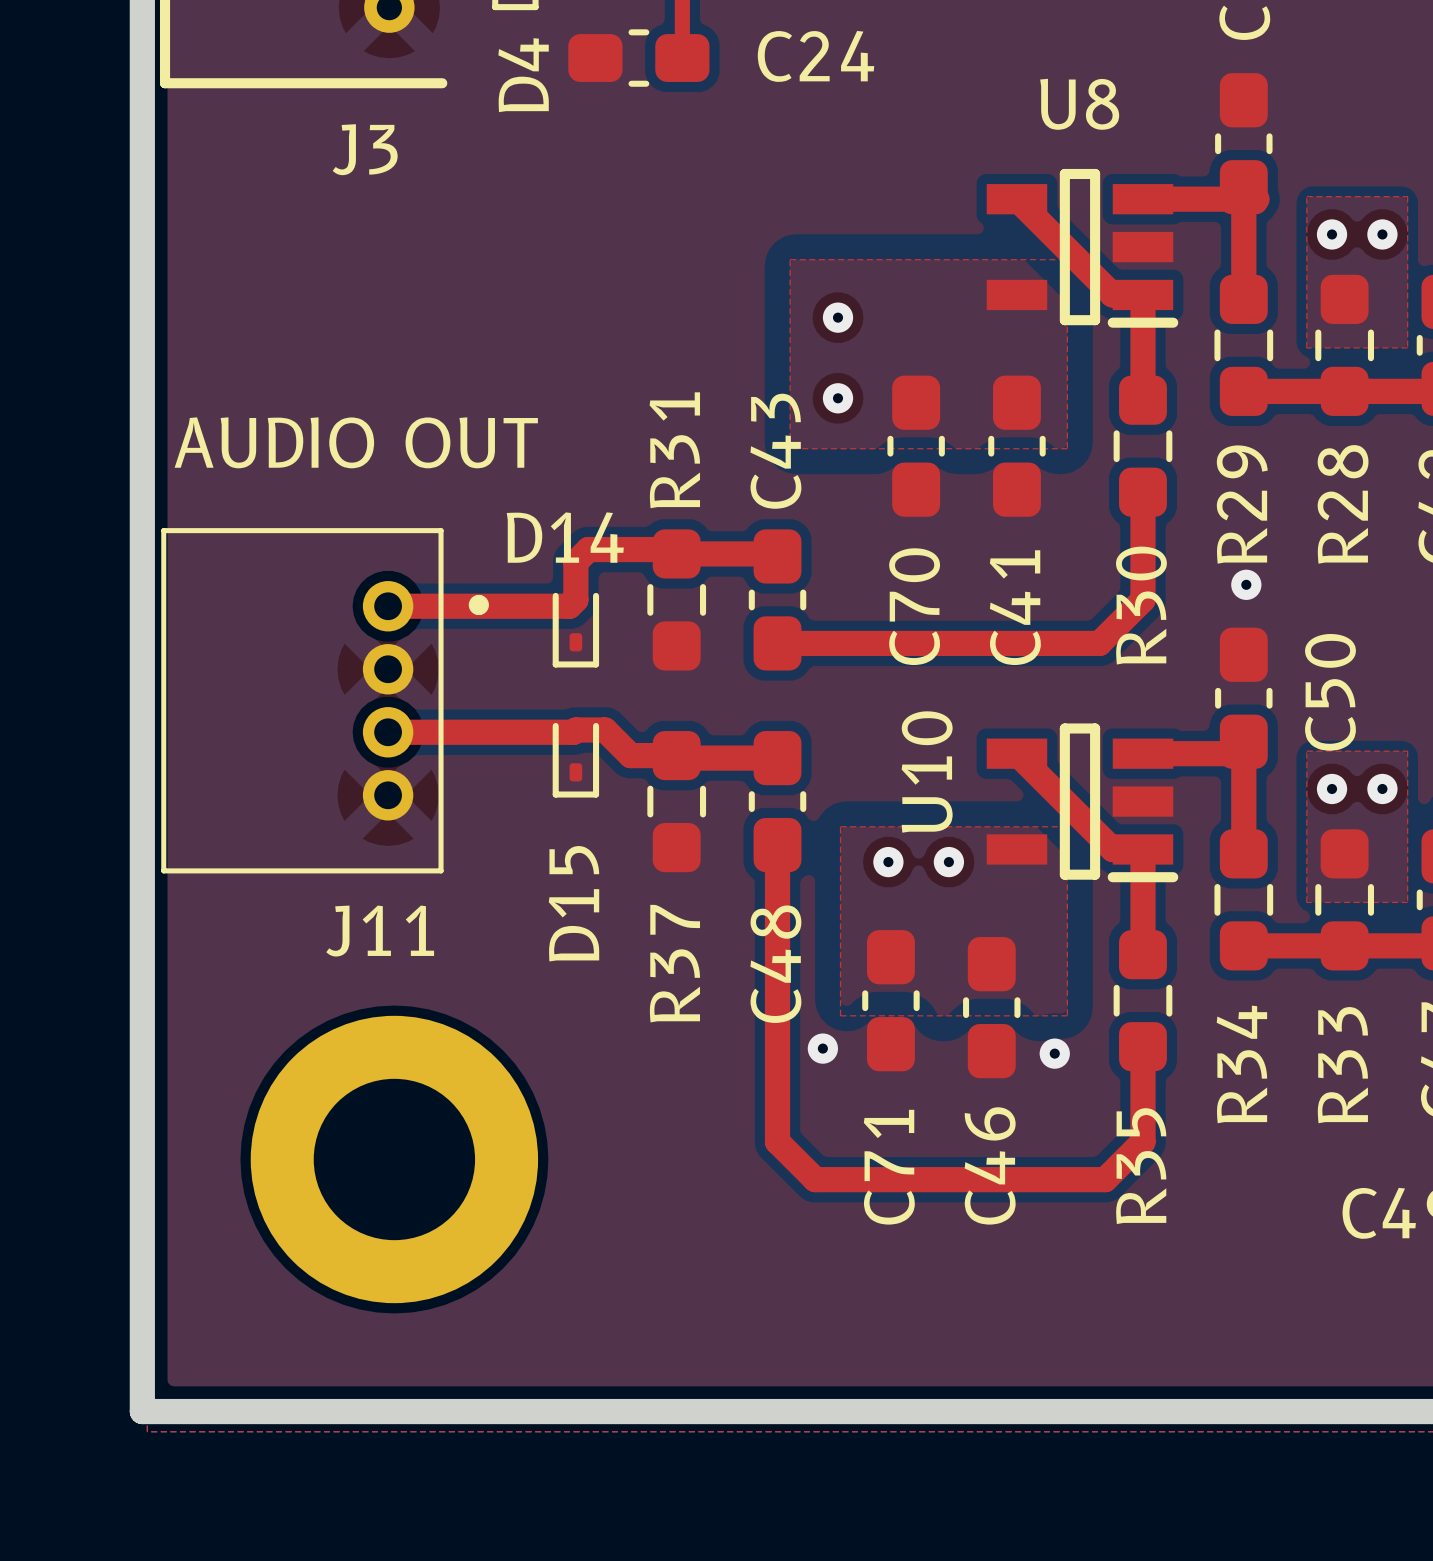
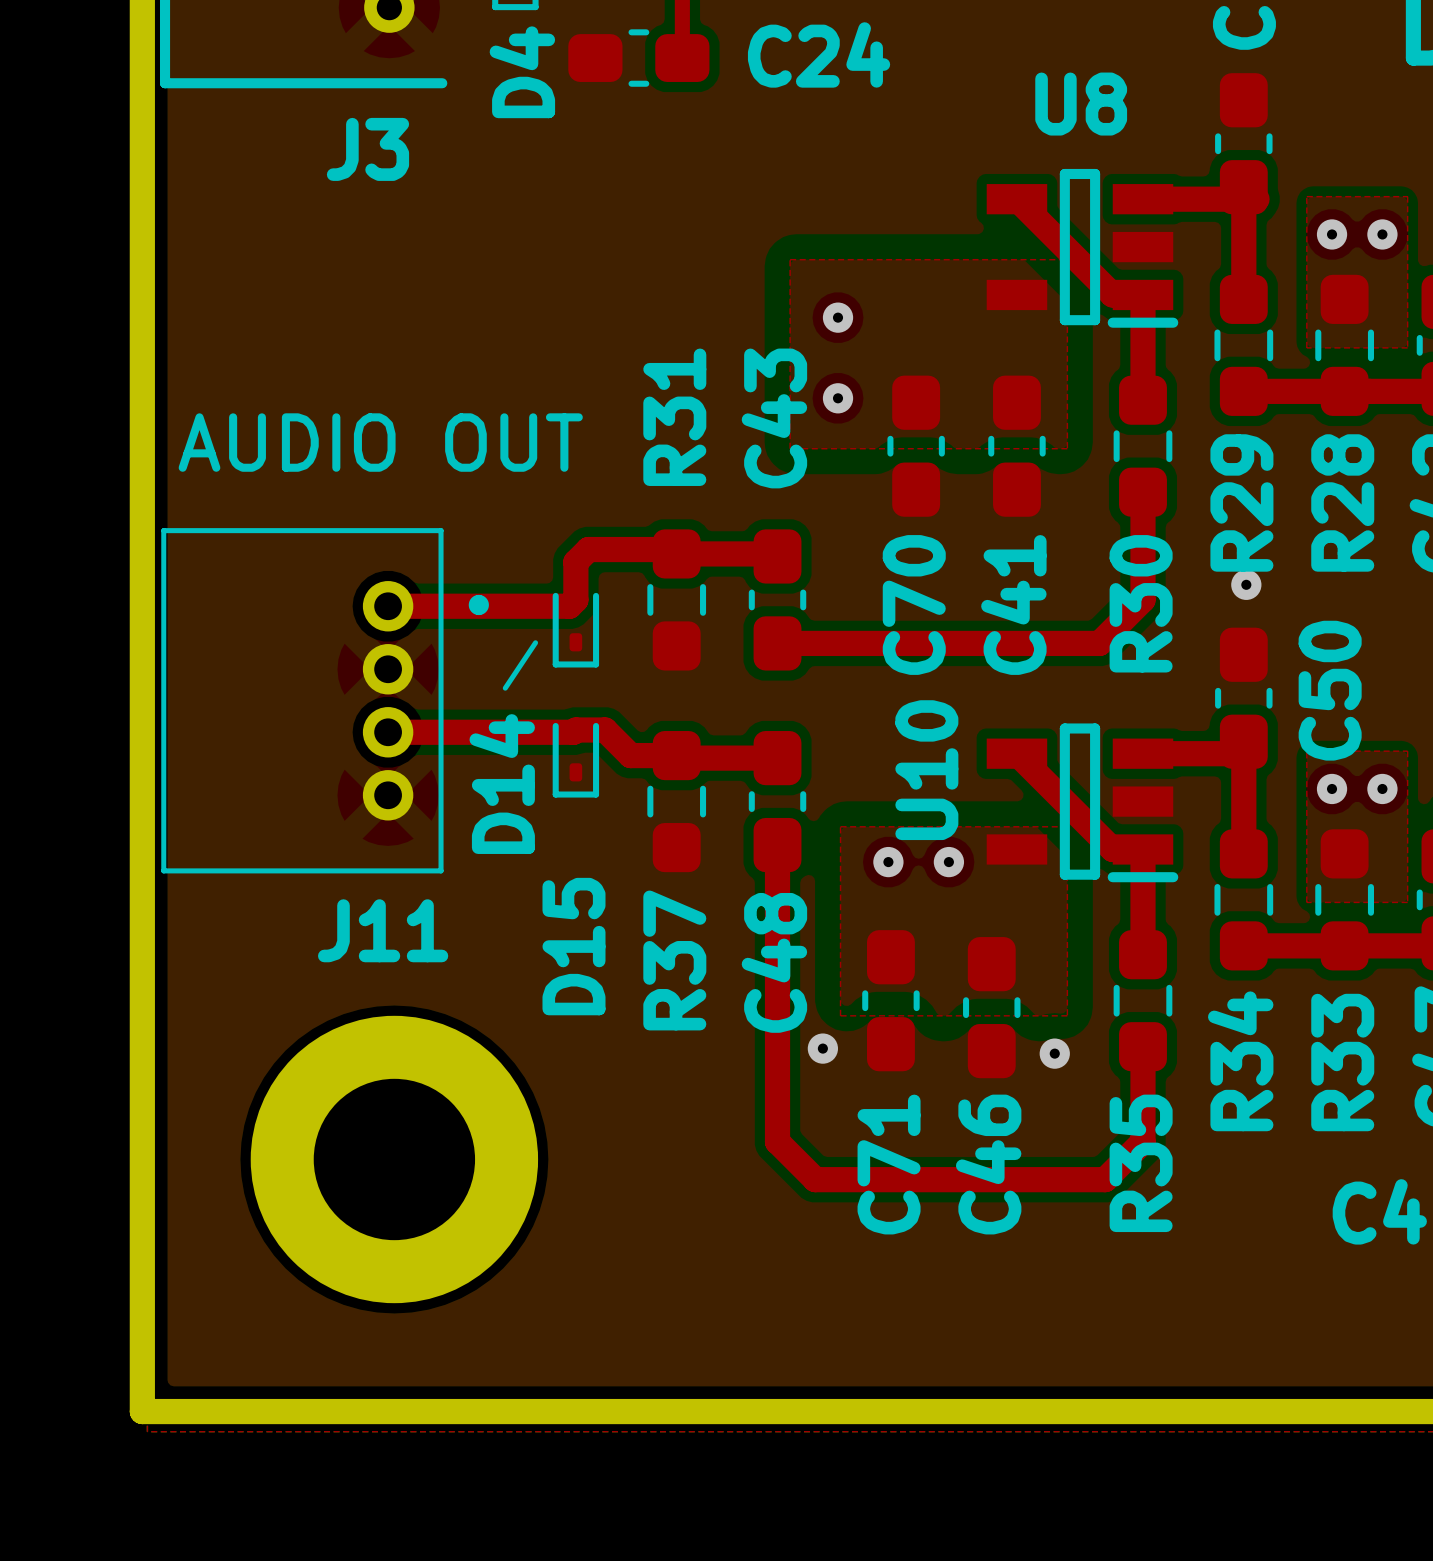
R31 name position: R31 (674, 450) -> R31 (674, 417)
C43 name position: C43 (775, 451) -> C43 (774, 418)
D14 name rotation: 0° (565, 537) -> 90° counterclockwise (502, 784)
D14 name position: D14 (565, 537) -> D14 (502, 784)
line: none -> (535, 642) (505, 688)
D15 name position: D15 (573, 903) -> D15 (573, 946)

